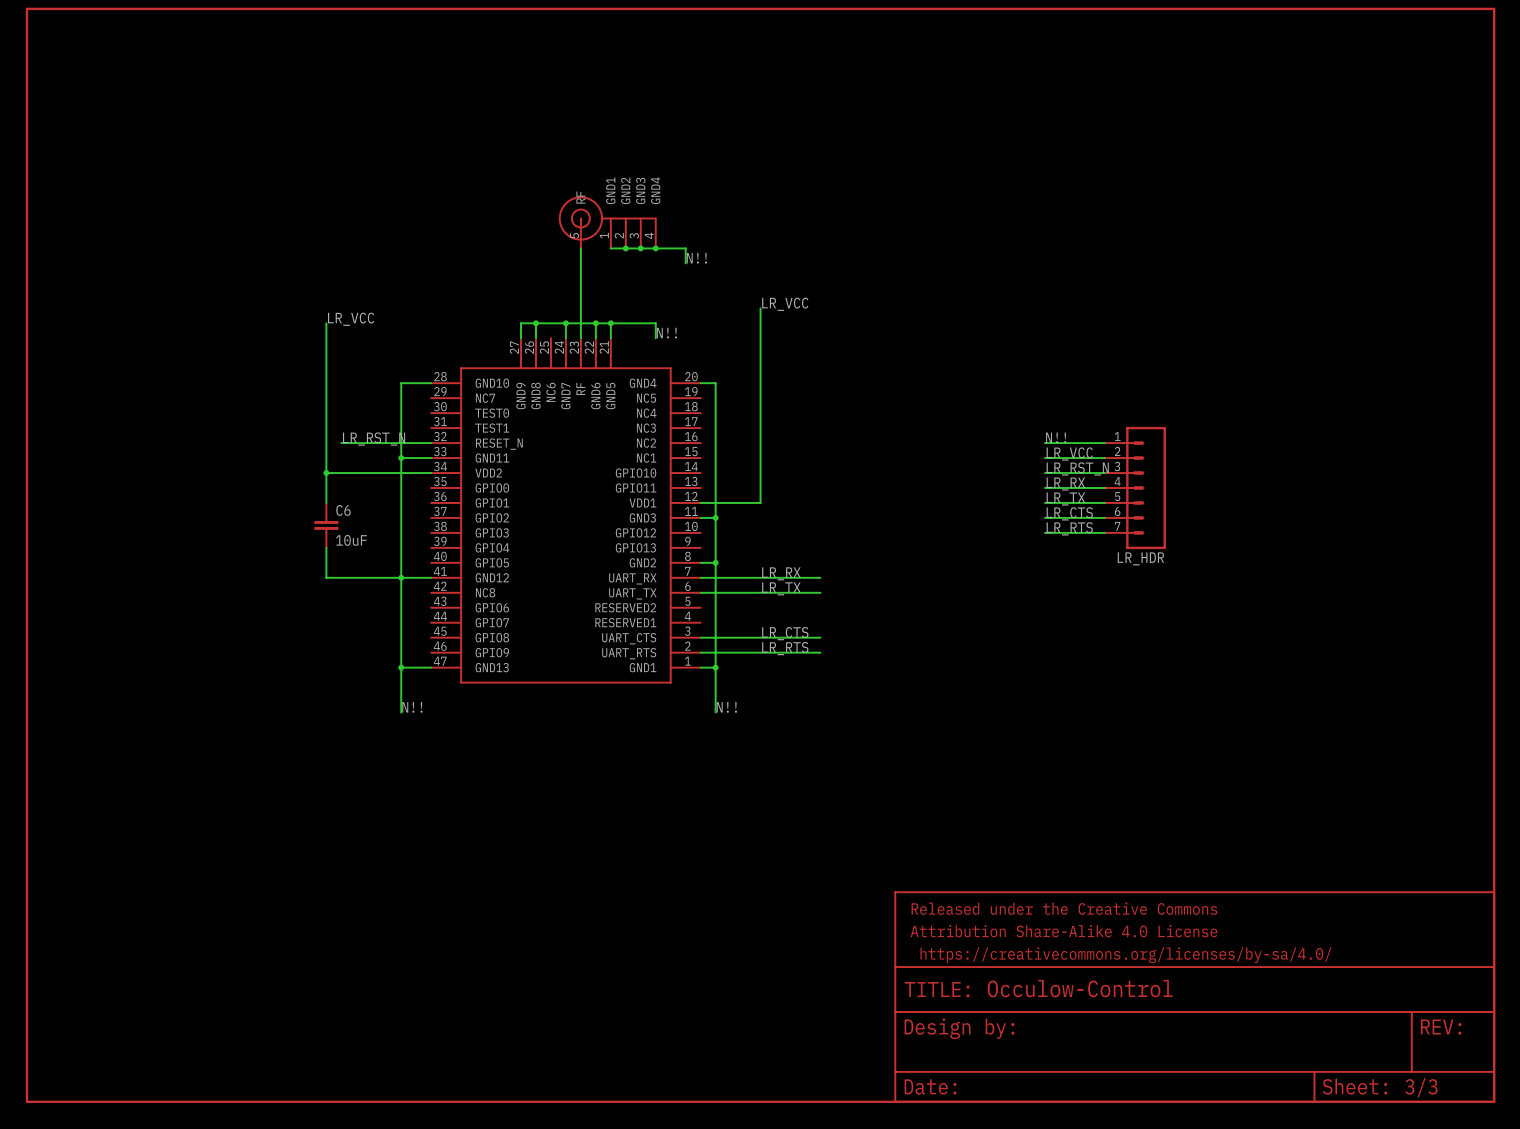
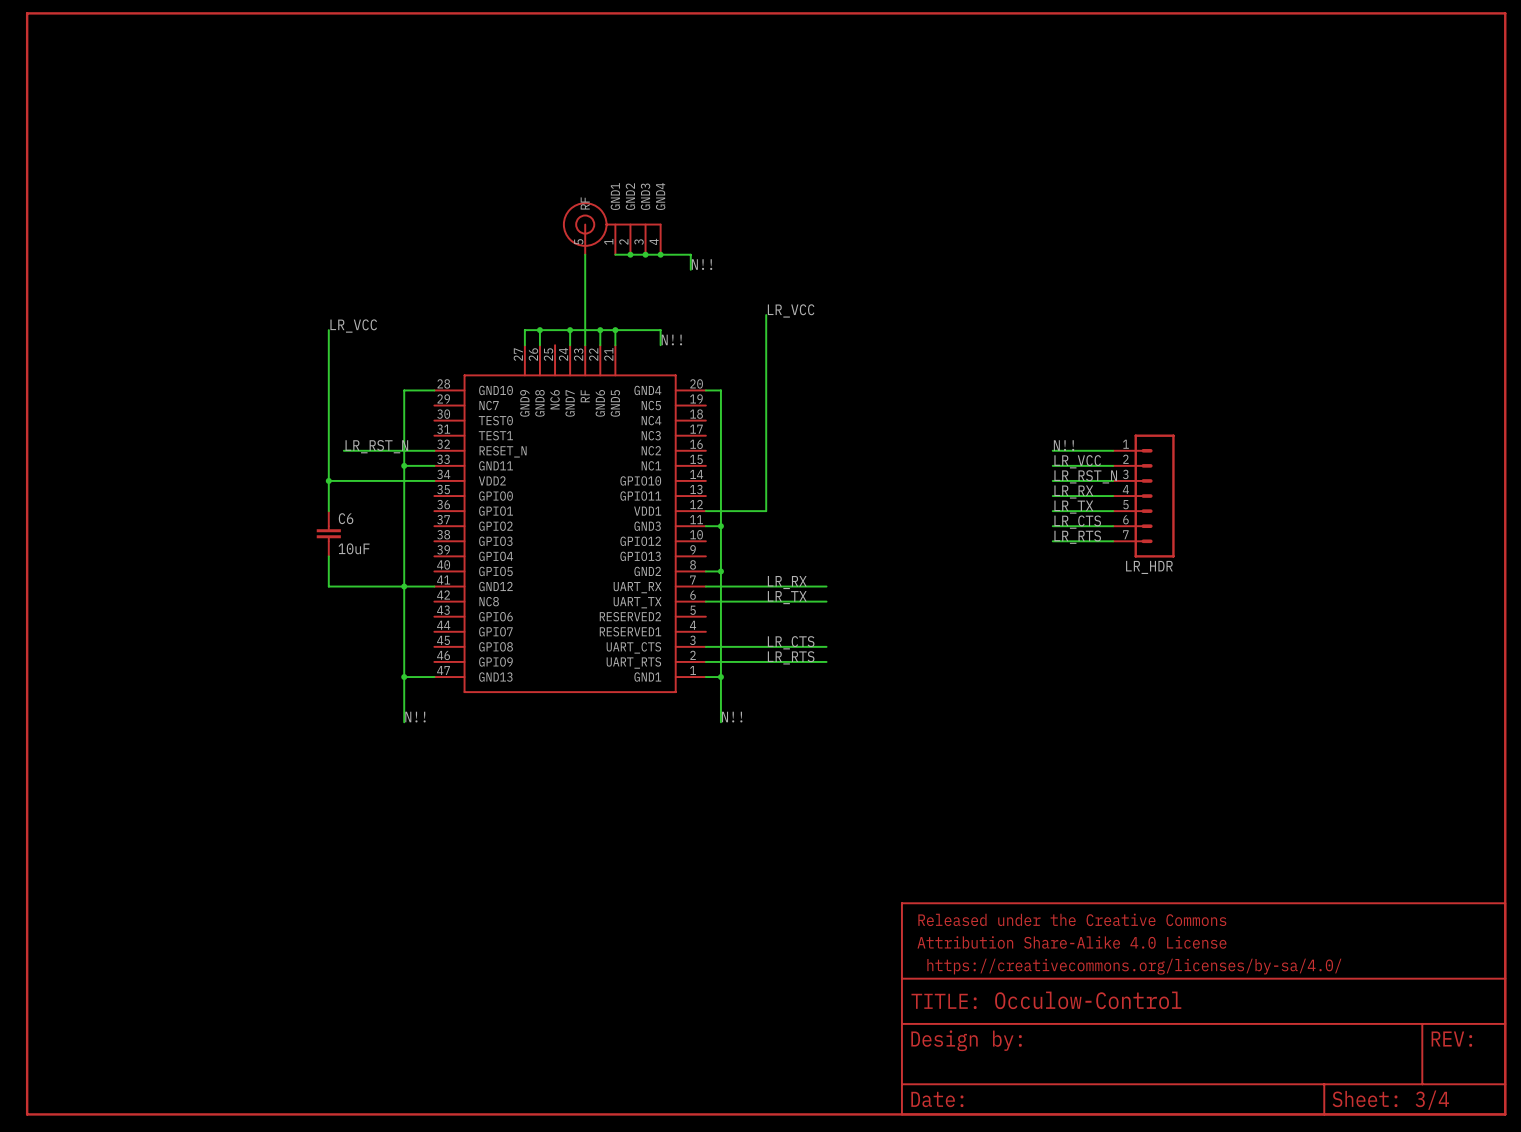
part text: 3/3 (1421, 1087) -> 3/4 (1432, 1100)

